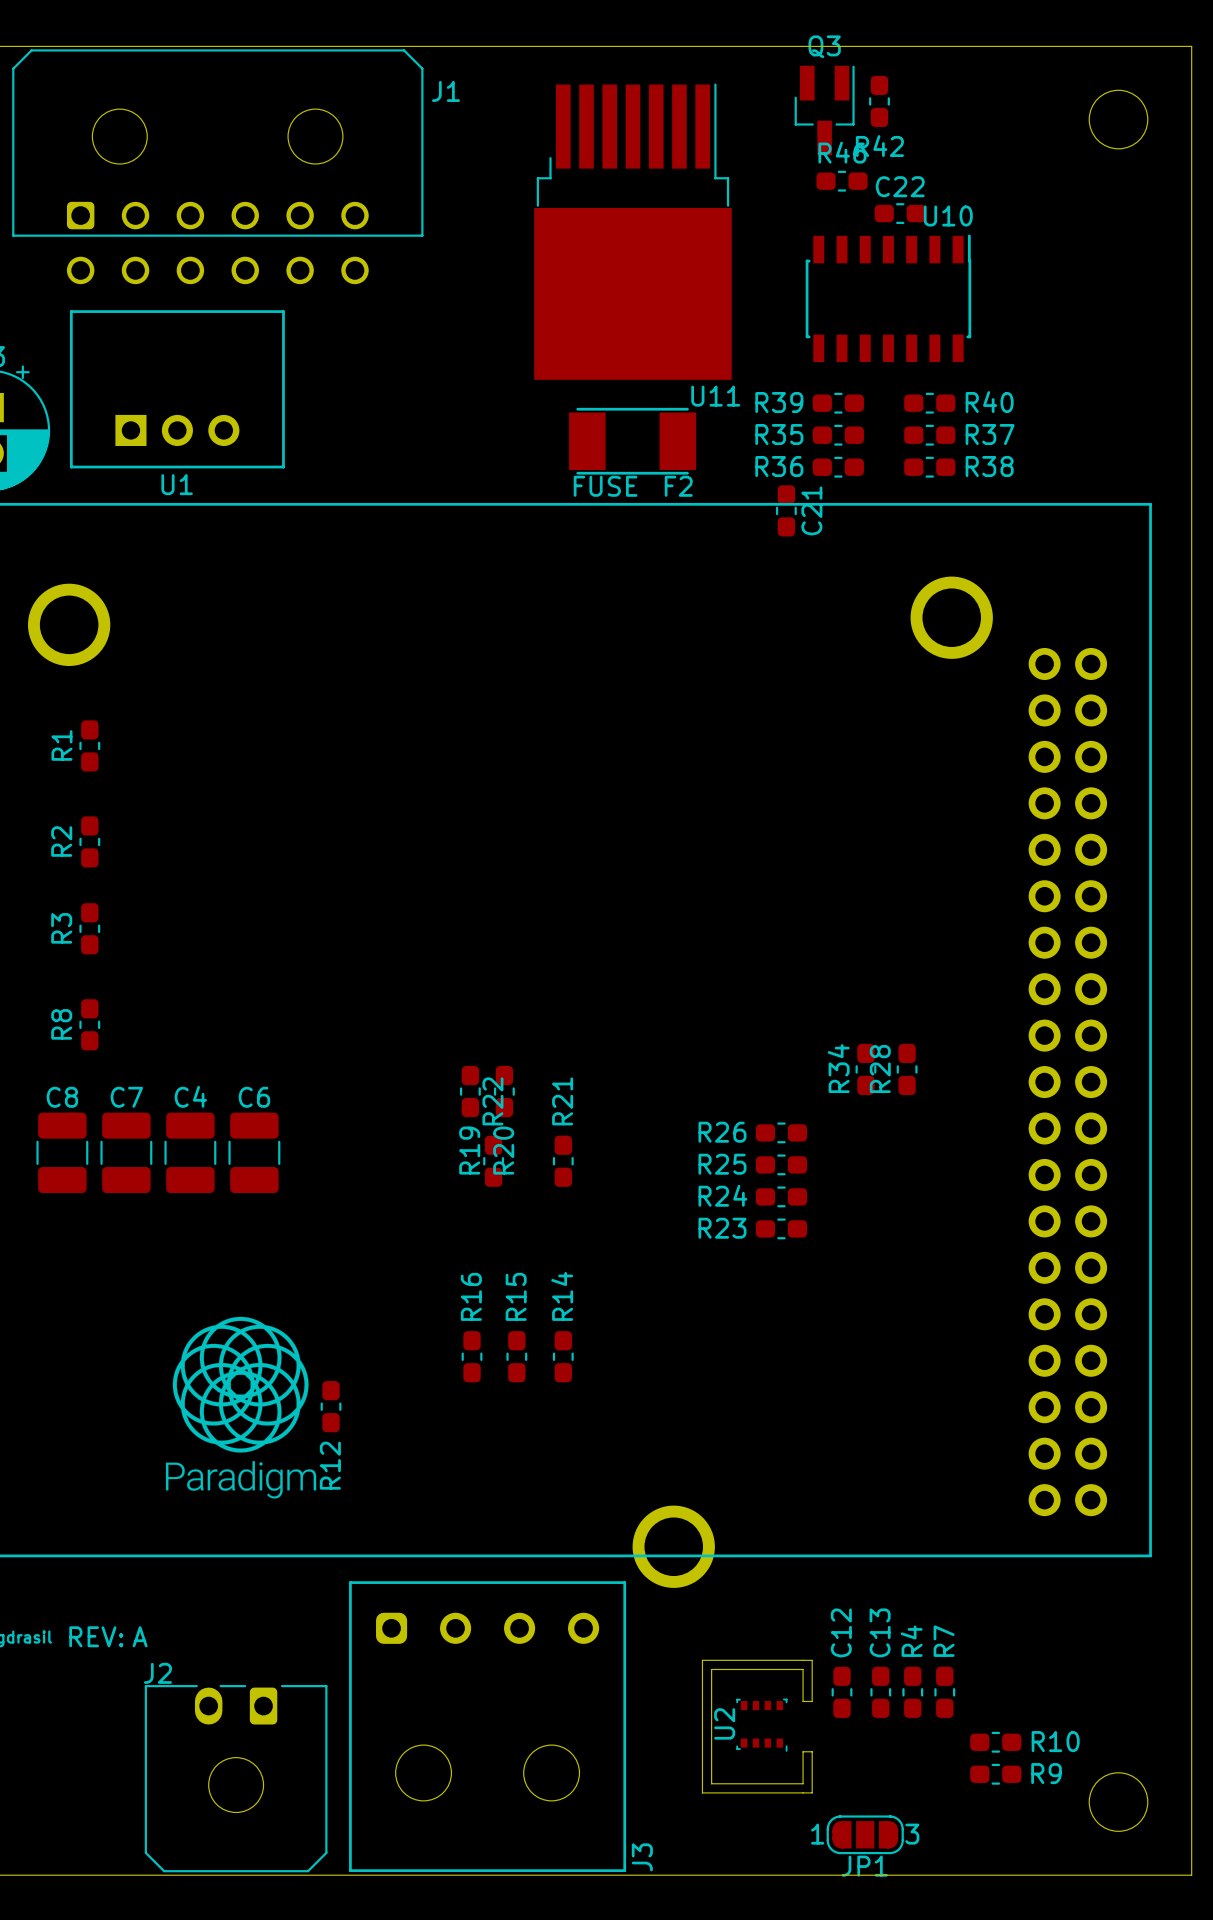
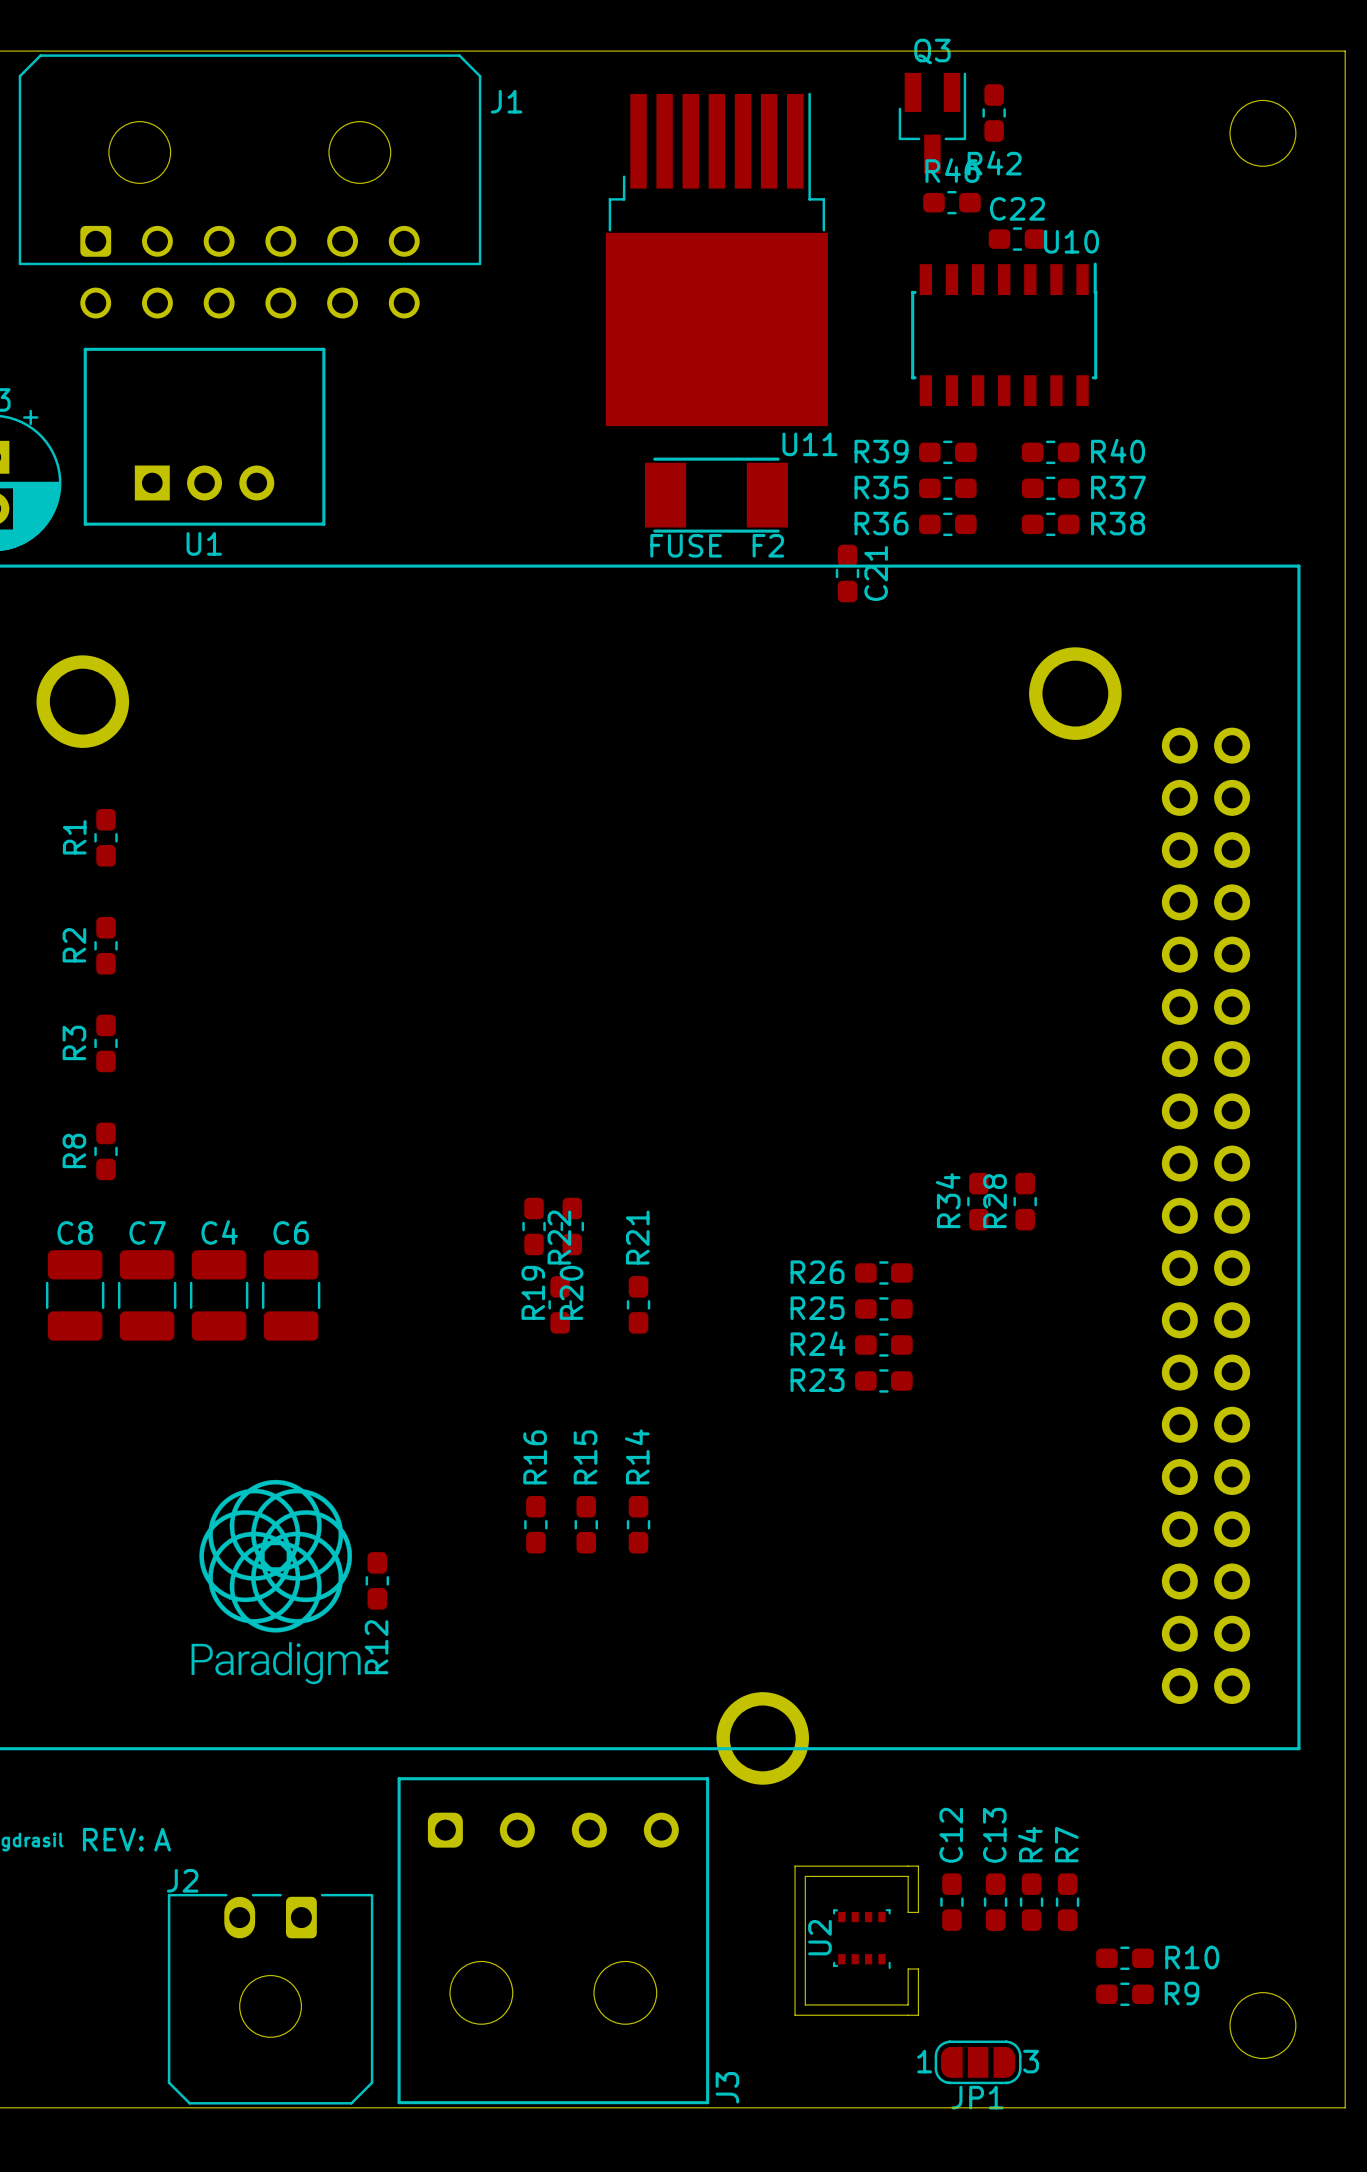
C21 position: (786, 510) -> (847, 573)

